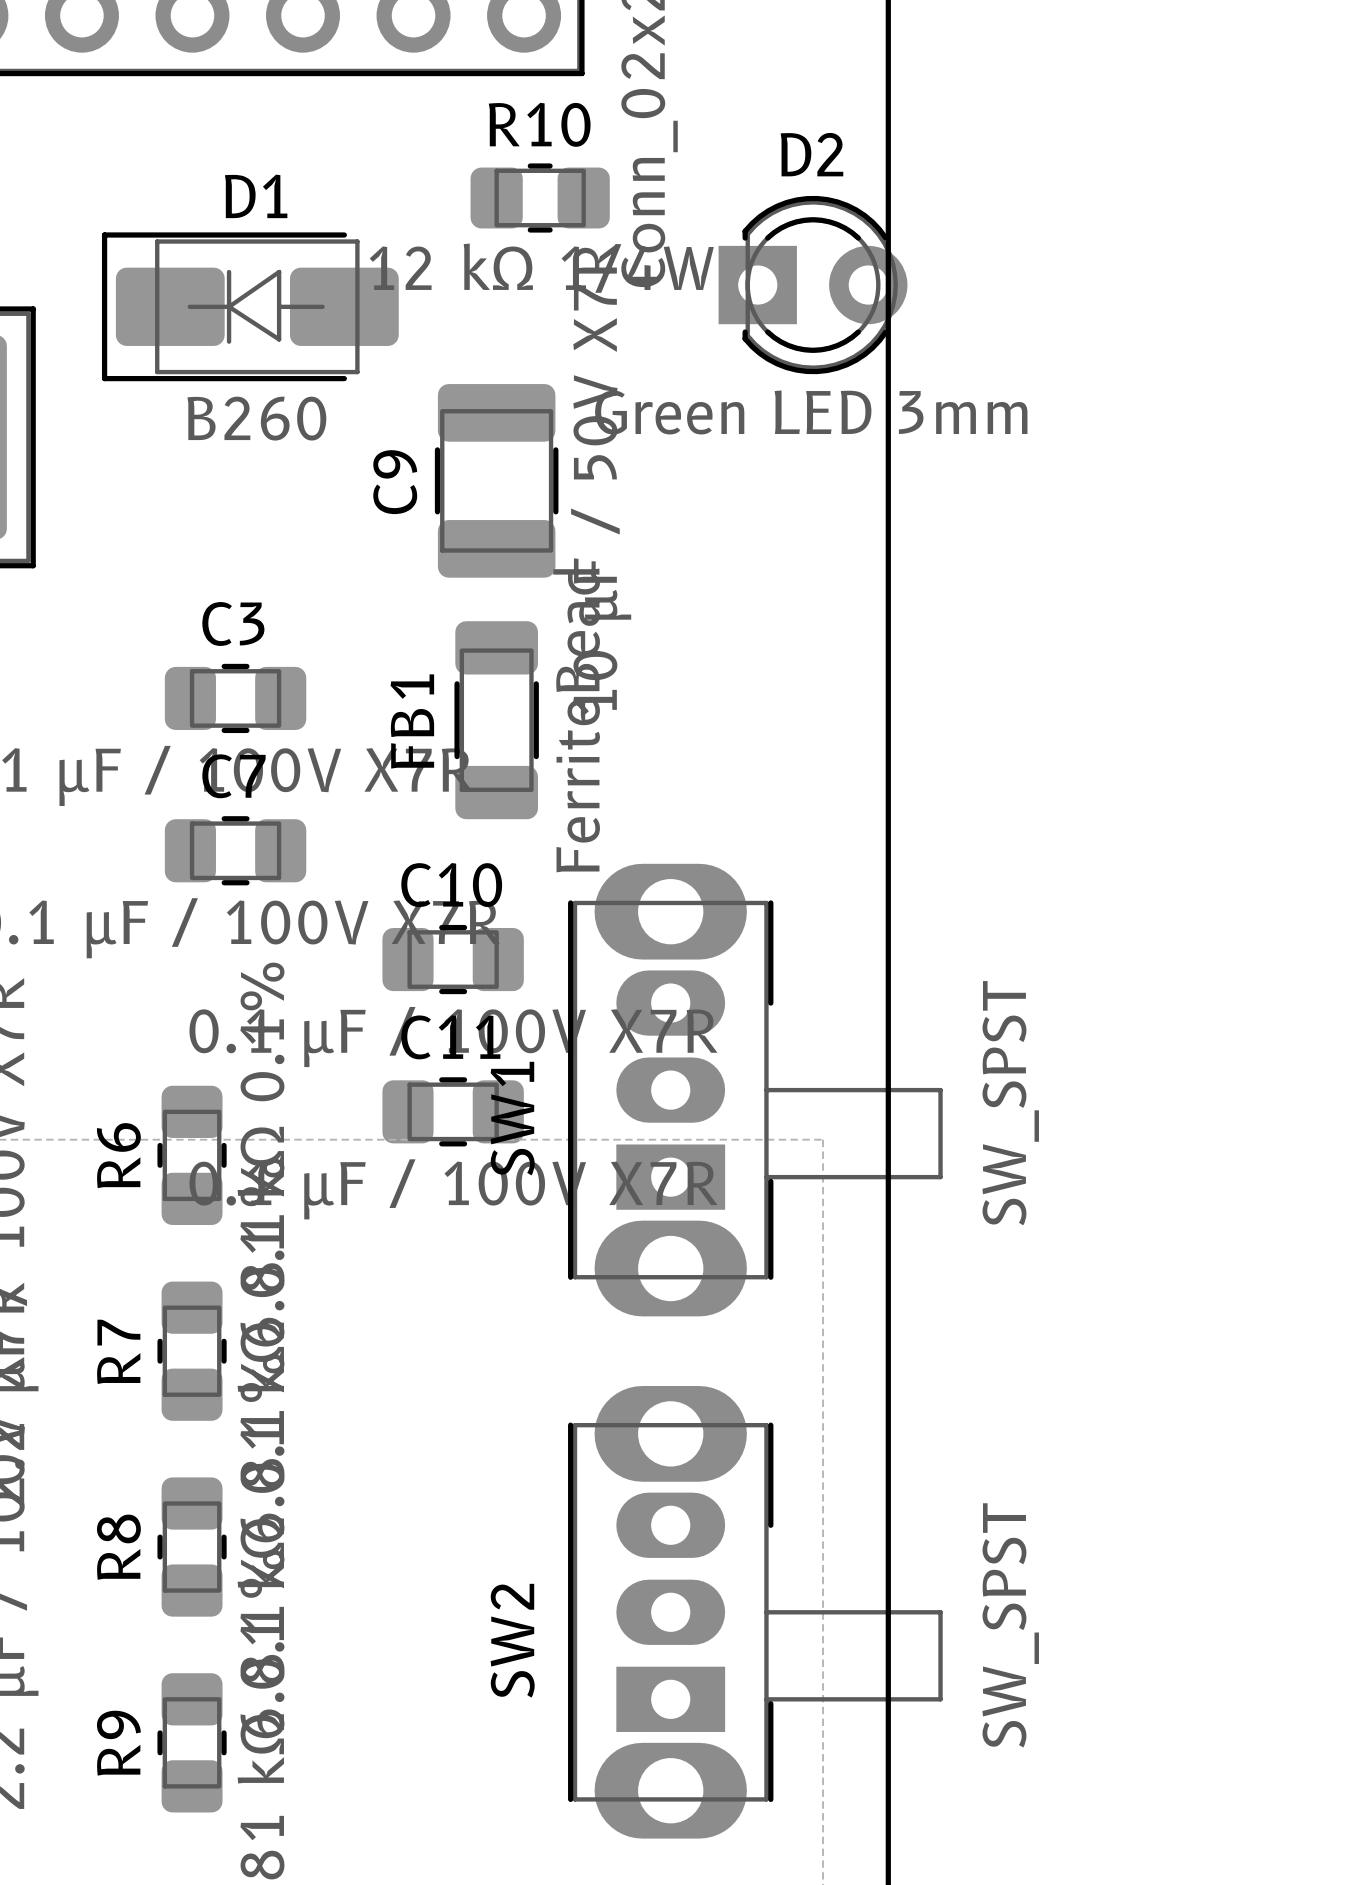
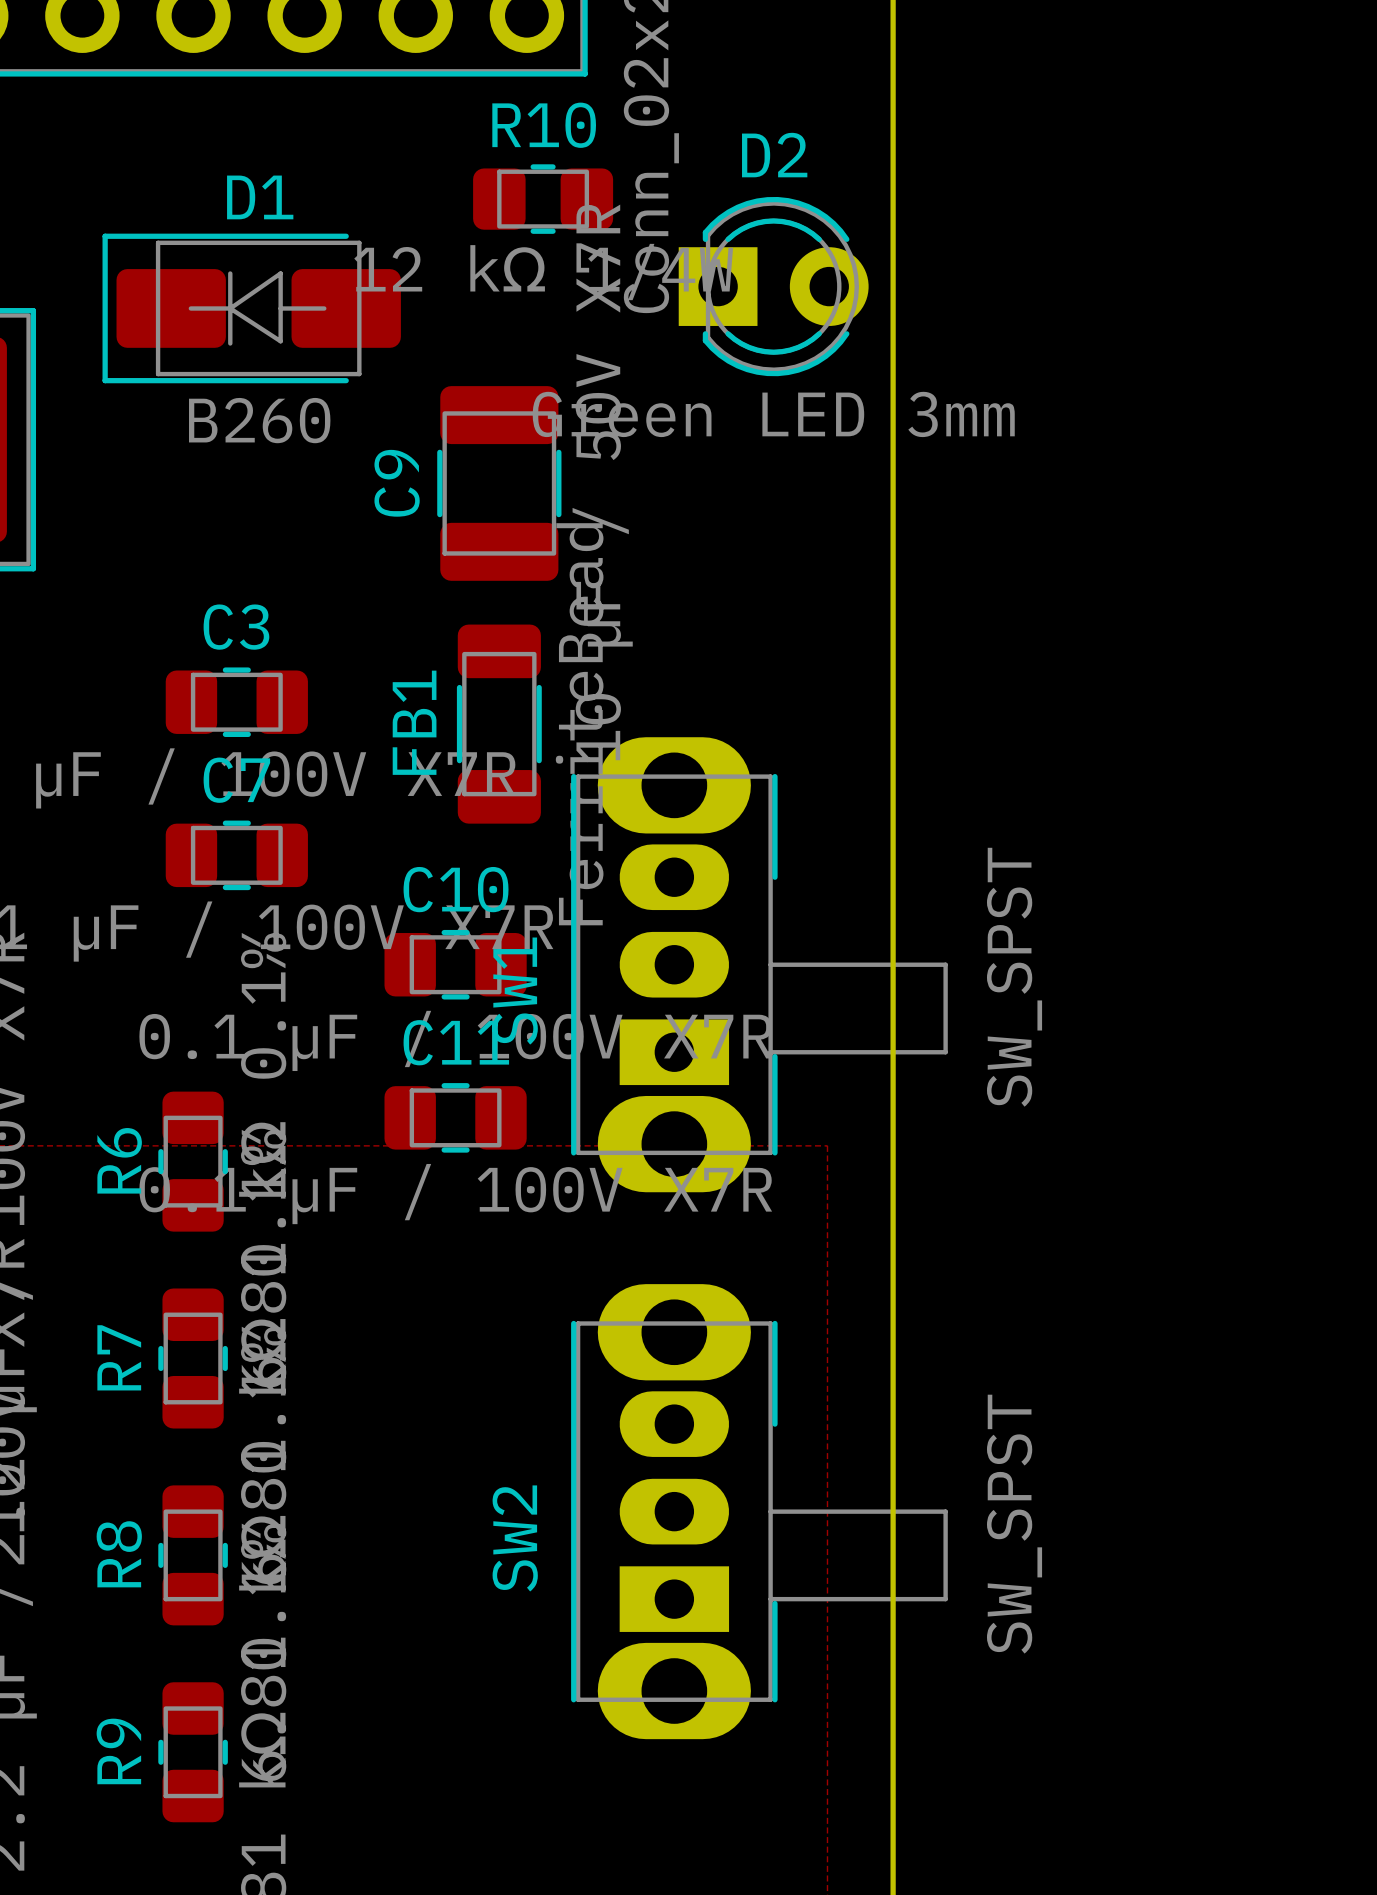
D2 position: (813, 285) -> (773, 286)
SW1 position: (755, 1090) -> (759, 964)
SW2 position: (755, 1612) -> (759, 1511)

